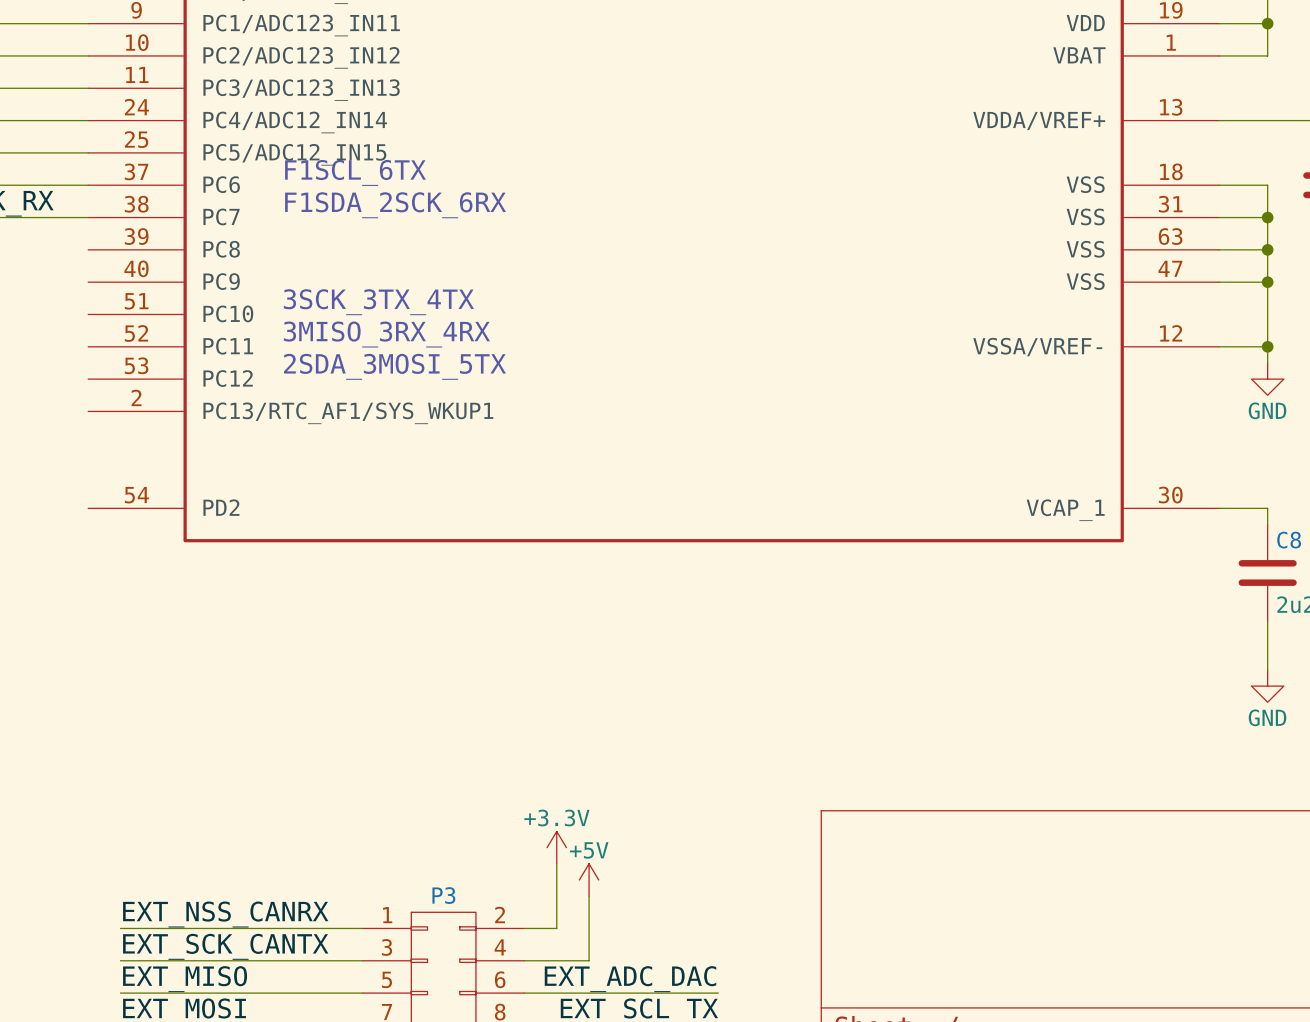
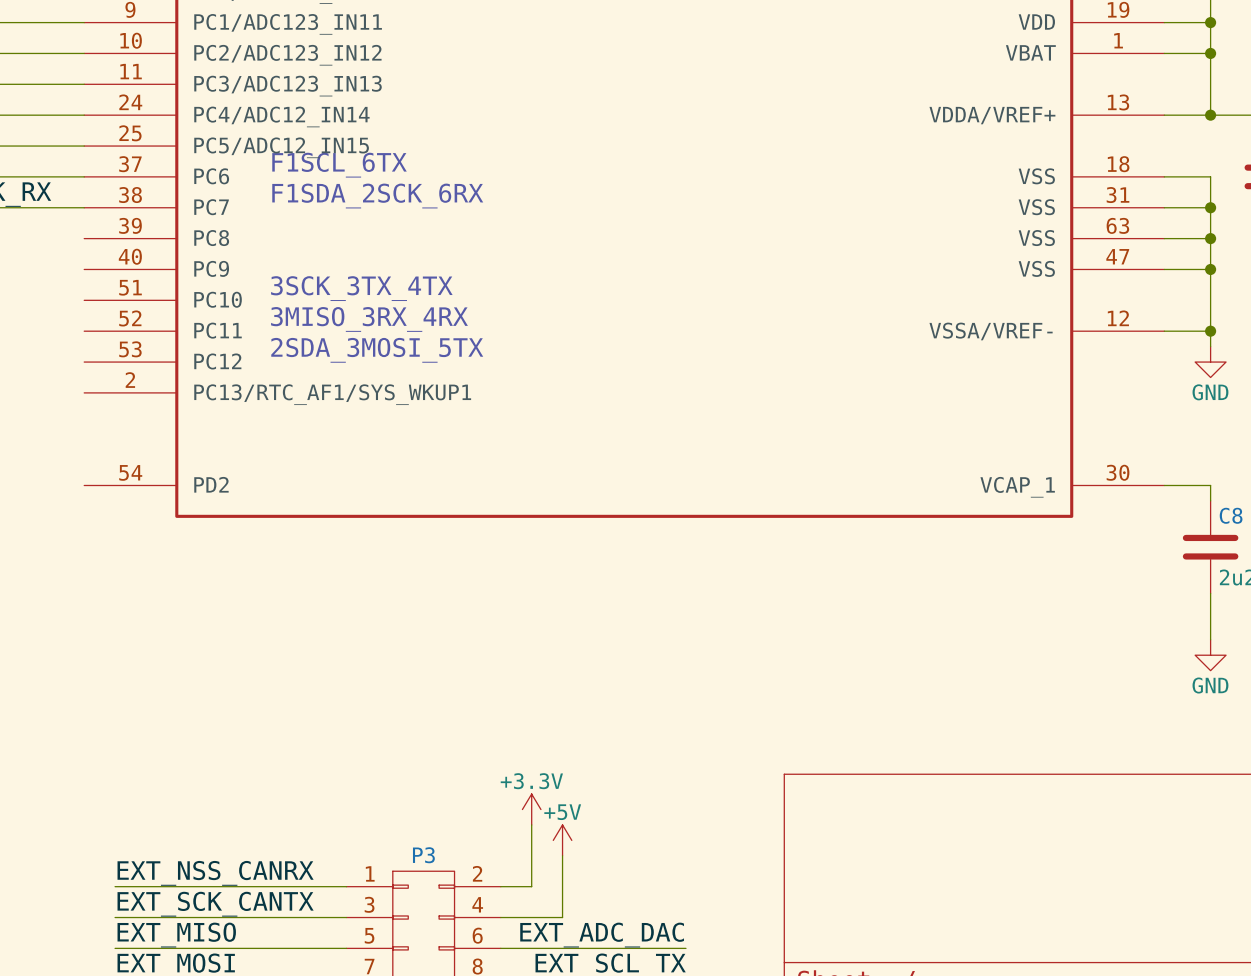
wire: none -> (1210, 53) (1210, 115)
junction: none -> (1210, 53)
junction: none -> (1210, 115)

